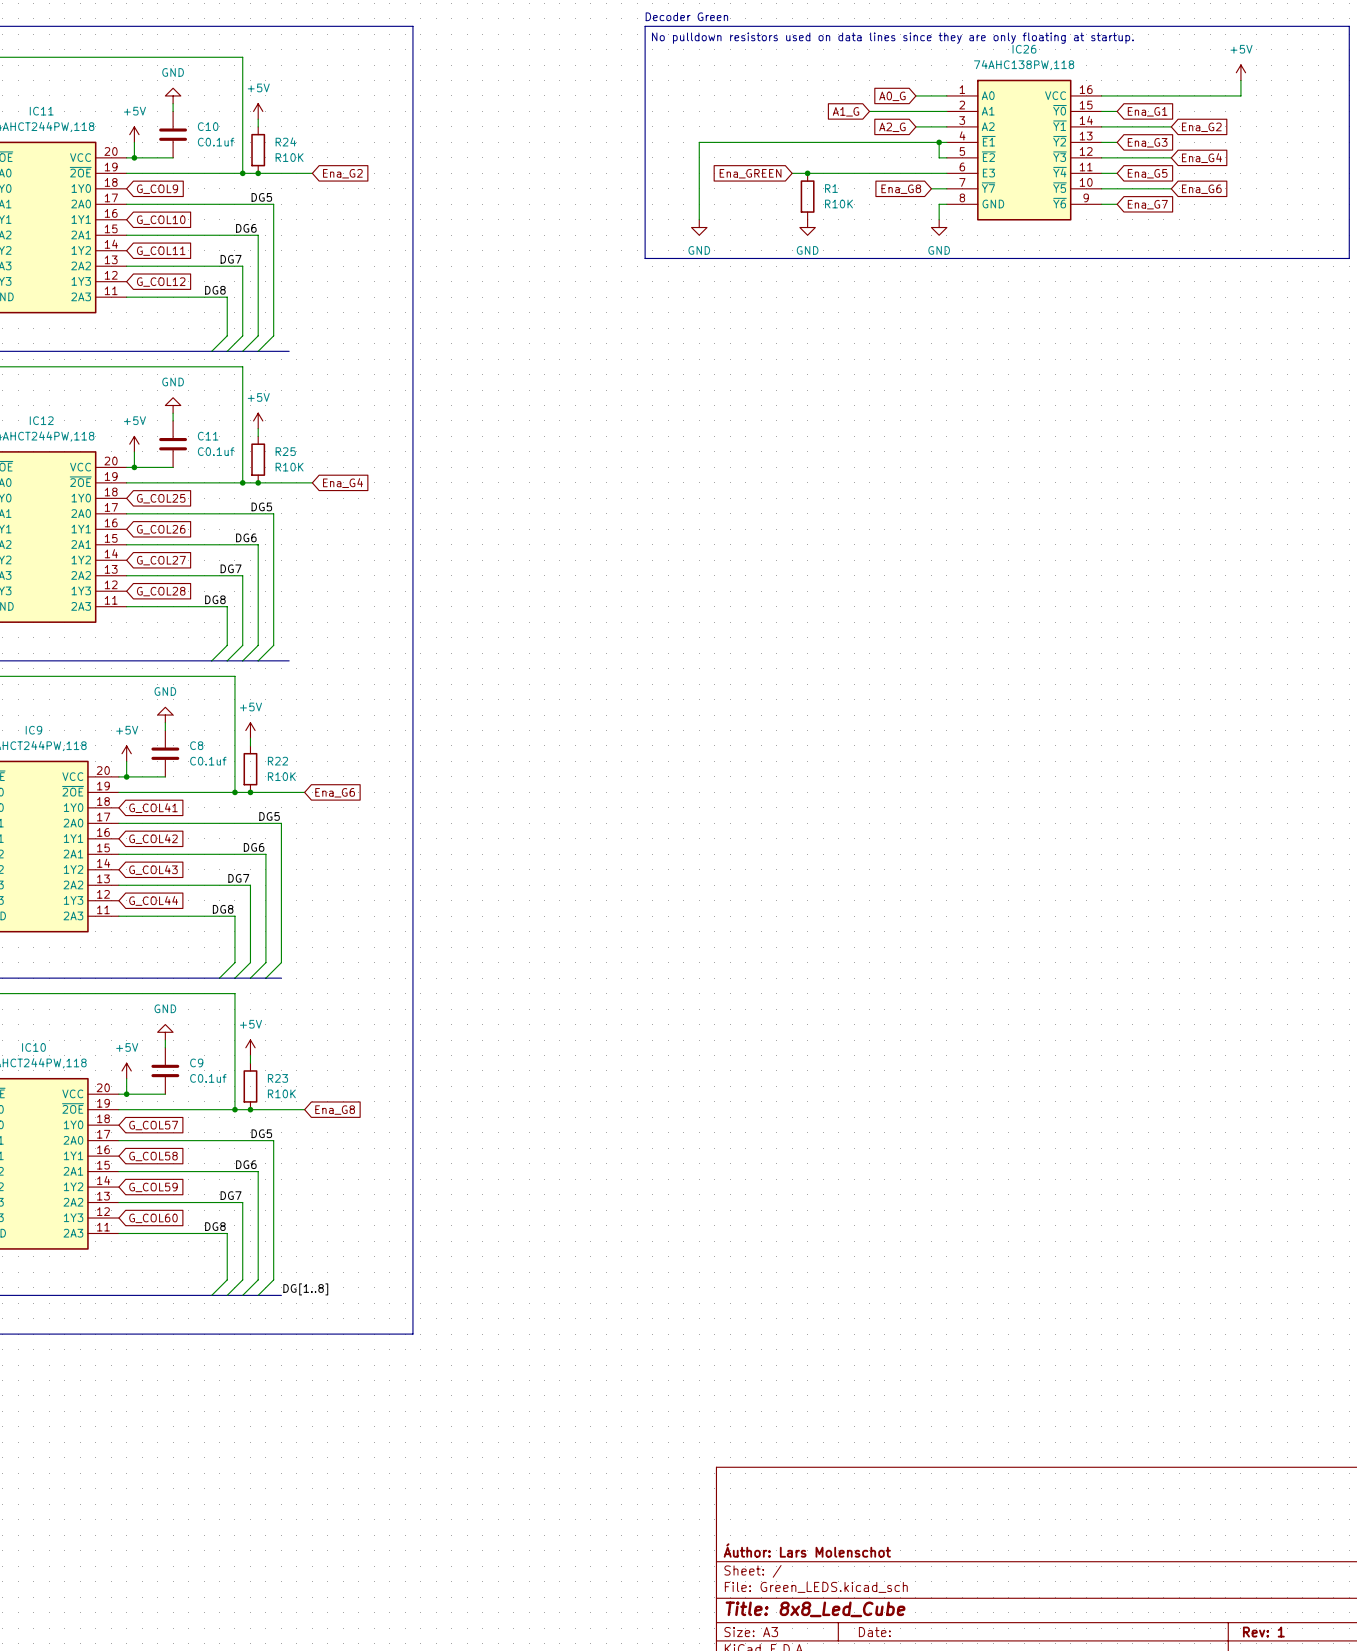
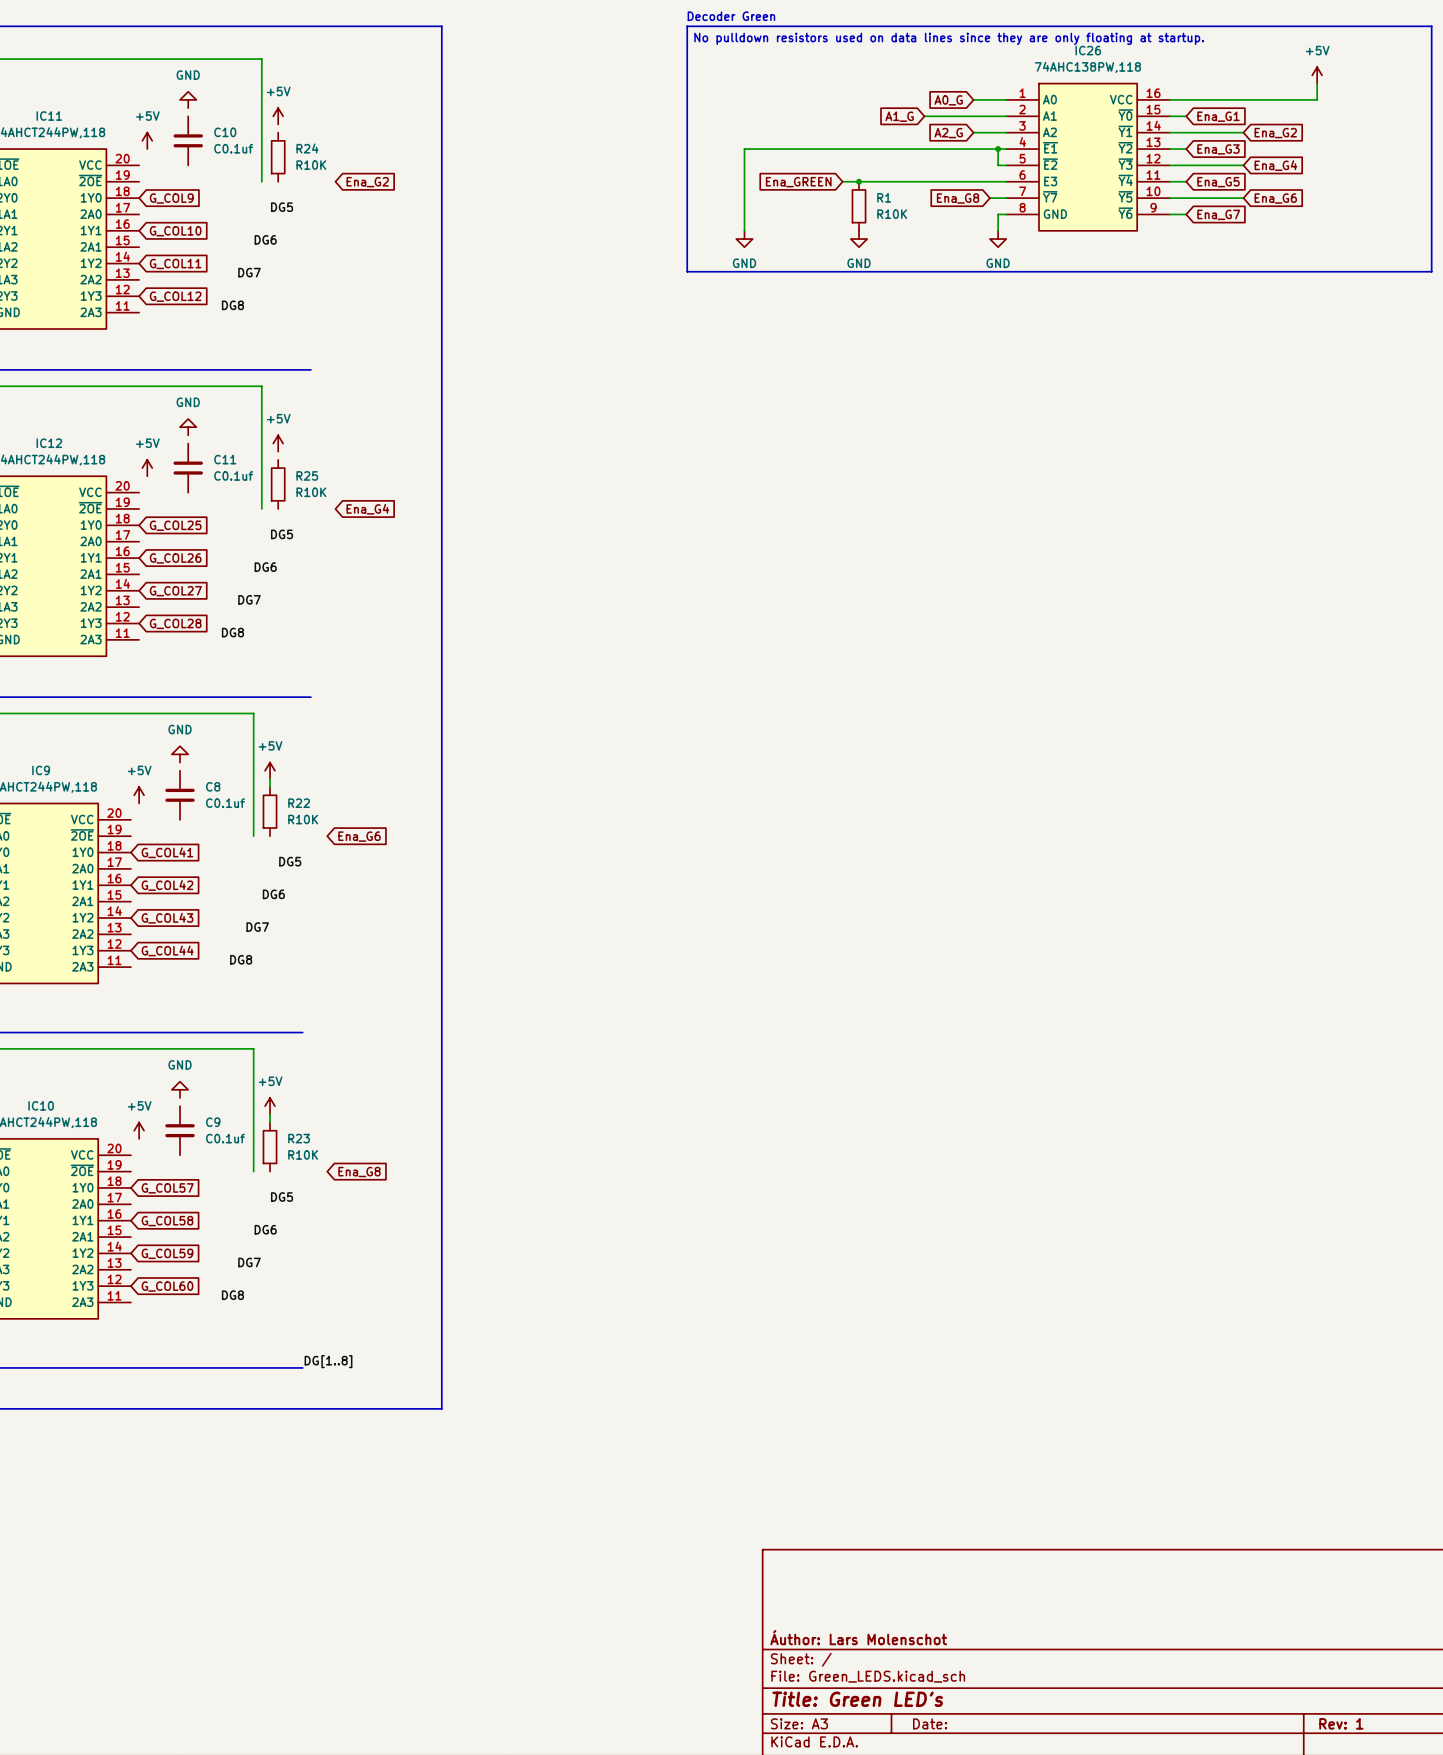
wire: (173, 103) (173, 111) -> none
wire: (258, 119) (258, 126) -> none
wire: (134, 142) (134, 157) -> none
wire: (126, 157) (173, 157) -> none
junction: (134, 157) -> none
wire: (126, 173) (312, 173) -> none
junction: (242, 173) -> none
junction: (258, 173) -> none
wire: (126, 204) (273, 204) (273, 335) (258, 351) -> none
wire: (126, 235) (258, 235) (258, 335) (242, 351) -> none
wire: (126, 266) (242, 266) (242, 335) (227, 351) -> none
wire: (126, 297) (227, 297) (227, 335) (211, 351) -> none
wire: (173, 413) (173, 420) -> none
wire: (258, 428) (258, 436) -> none
wire: (134, 451) (134, 467) -> none
wire: (126, 467) (173, 467) -> none
junction: (134, 467) -> none
wire: (126, 482) (312, 482) -> none
junction: (242, 482) -> none
junction: (258, 482) -> none
wire: (126, 513) (273, 513) (273, 645) (258, 660) -> none
wire: (126, 544) (258, 544) (258, 645) (242, 660) -> none
wire: (126, 575) (242, 575) (242, 645) (227, 660) -> none
wire: (126, 606) (227, 606) (227, 645) (211, 660) -> none
wire: (165, 722) (165, 730) -> none
wire: (126, 761) (126, 776) -> none
wire: (118, 776) (165, 776) -> none
junction: (126, 776) -> none
wire: (118, 792) (304, 792) -> none
junction: (234, 792) -> none
junction: (250, 792) -> none
wire: (118, 823) (281, 823) (281, 962) (265, 978) -> none
wire: (118, 854) (265, 854) (265, 962) (250, 978) -> none
wire: (118, 885) (250, 885) (250, 962) (234, 978) -> none
wire: (118, 916) (234, 916) (234, 962) (219, 978) -> none
wire: (165, 1040) (165, 1047) -> none
wire: (126, 1078) (126, 1094) -> none
wire: (118, 1094) (165, 1094) -> none
junction: (126, 1094) -> none
wire: (118, 1109) (304, 1109) -> none
junction: (234, 1109) -> none
junction: (250, 1109) -> none
wire: (118, 1140) (273, 1140) (273, 1279) (258, 1295) -> none
wire: (118, 1171) (258, 1171) (258, 1279) (242, 1295) -> none
wire: (118, 1202) (242, 1202) (242, 1279) (227, 1295) -> none
wire: (118, 1233) (227, 1233) (227, 1279) (211, 1295) -> none
title block: Title: 8x8_Led_Cube (815, 1609) -> Title: Green LED's (857, 1699)

